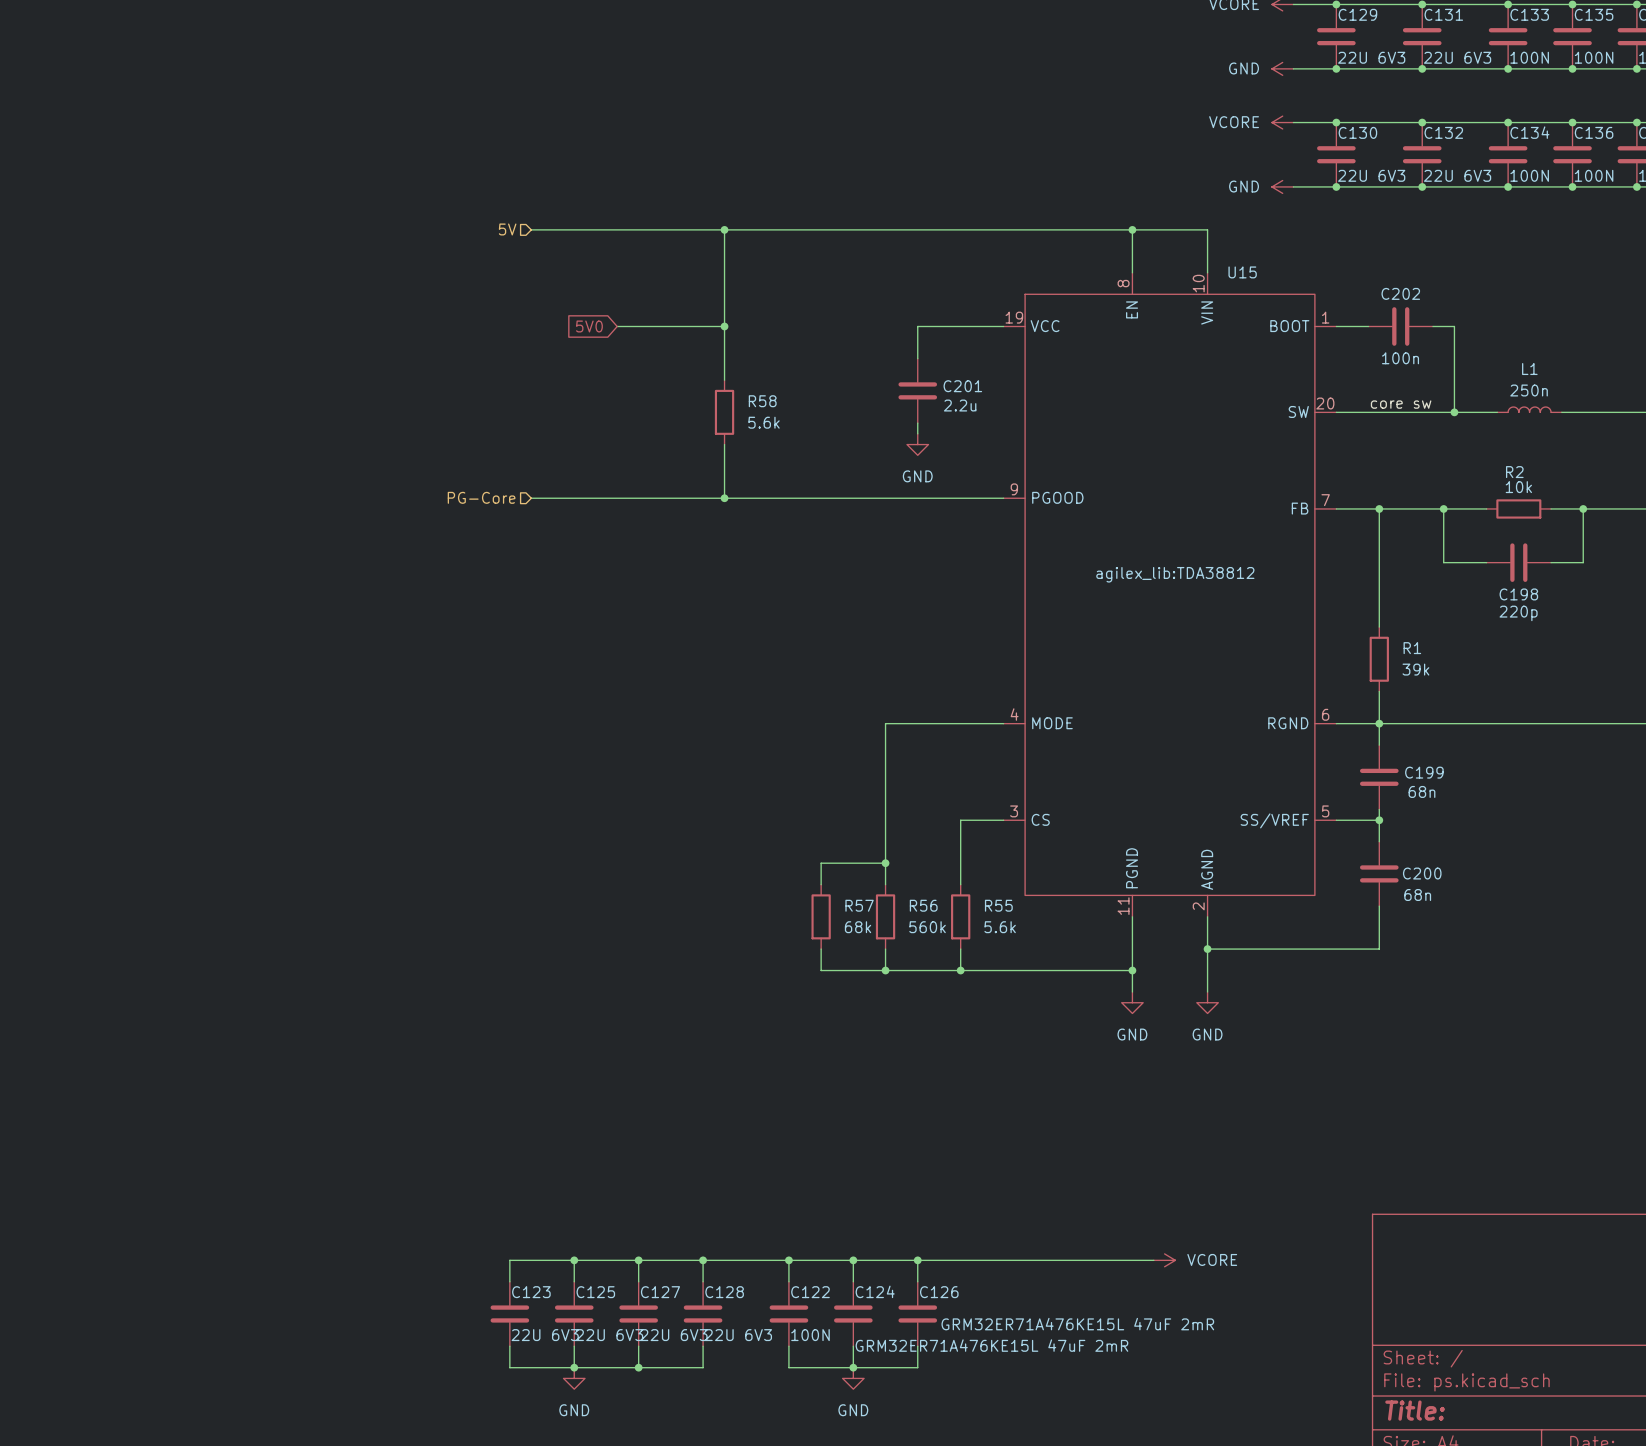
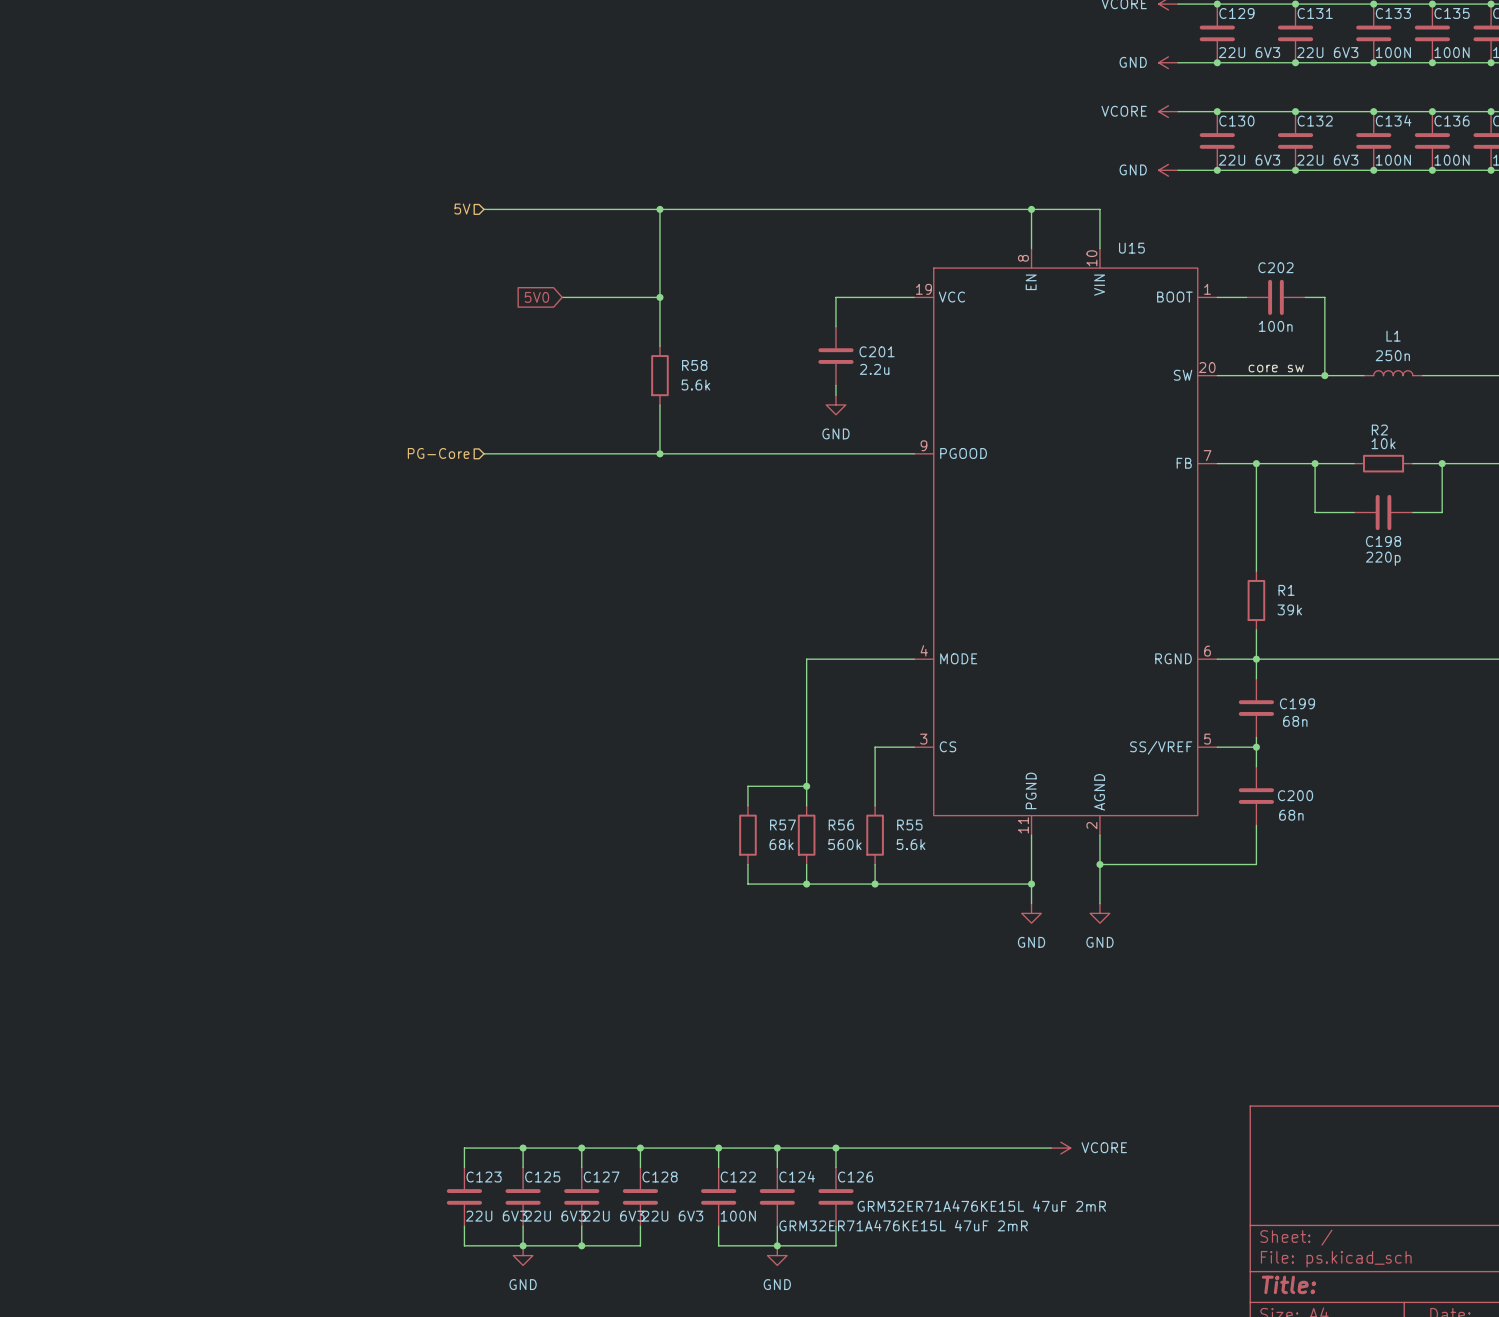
U15 text: agilex_lib:TDA38812 (1175, 574) -> none

